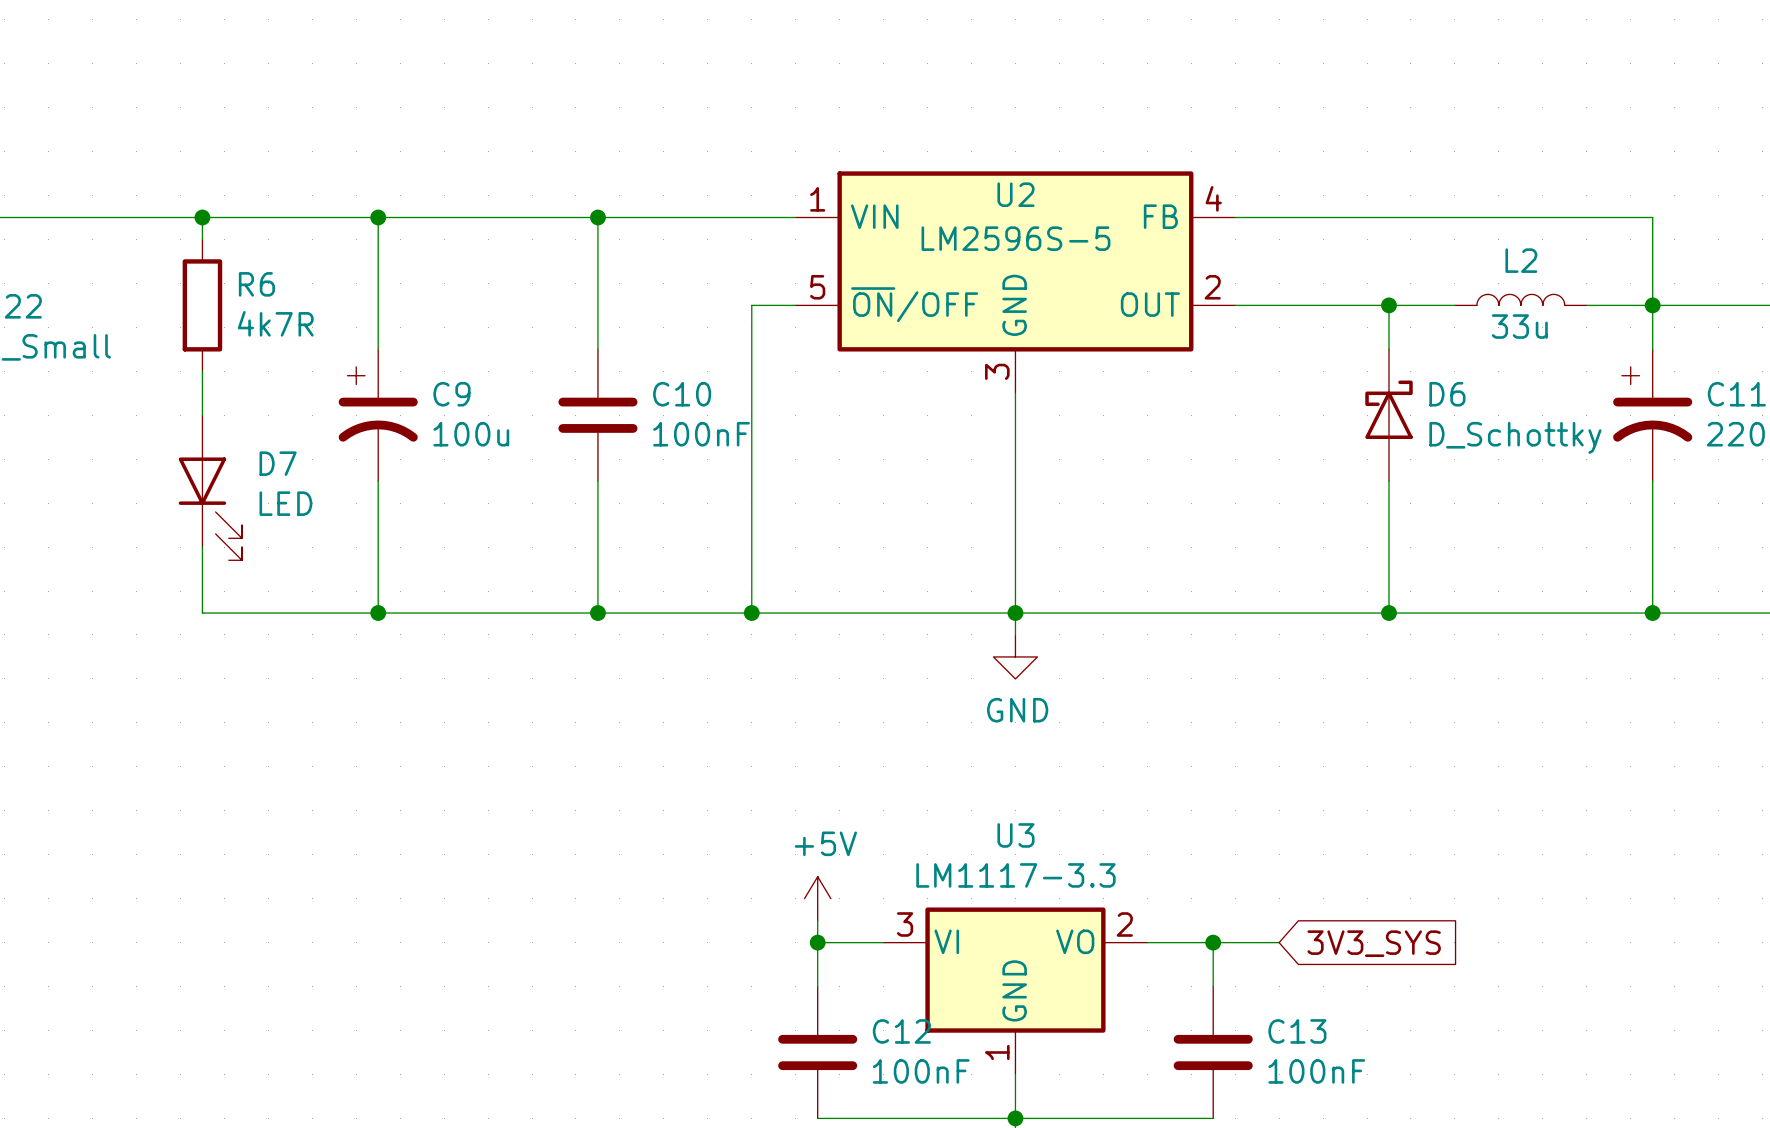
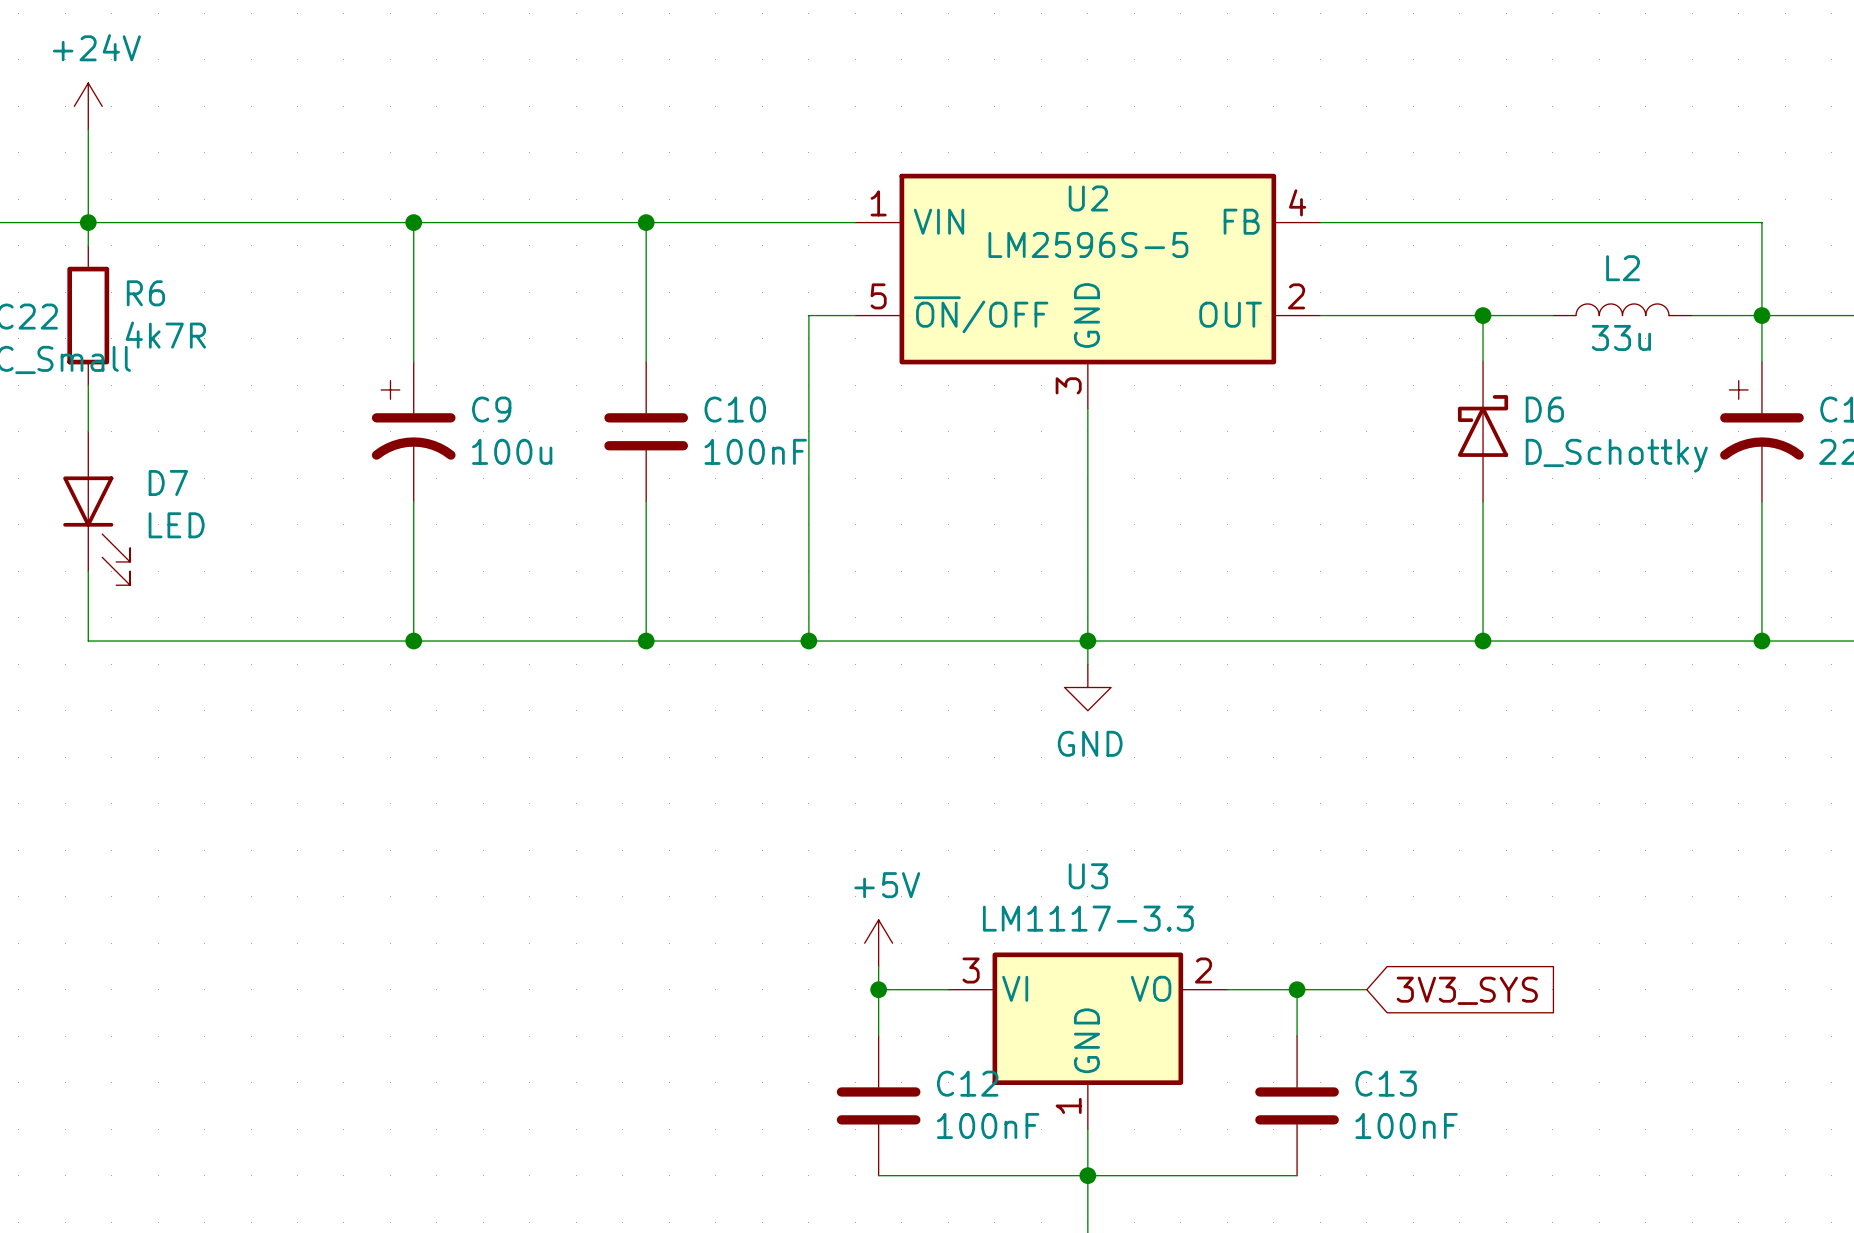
power symbol: none -> +24V (88, 106)
wire: none -> (88, 129) (88, 245)
junction: none -> (88, 222)
wire: (202, 217) (202, 239) -> none
junction: (202, 217) -> none
R6 position: (202, 305) -> (88, 315)
wire: (202, 371) (202, 415) -> (88, 385) (88, 431)
D7 position: (210, 487) -> (96, 508)
wire: (202, 547) (202, 613) -> (88, 571) (88, 641) (227, 641)

